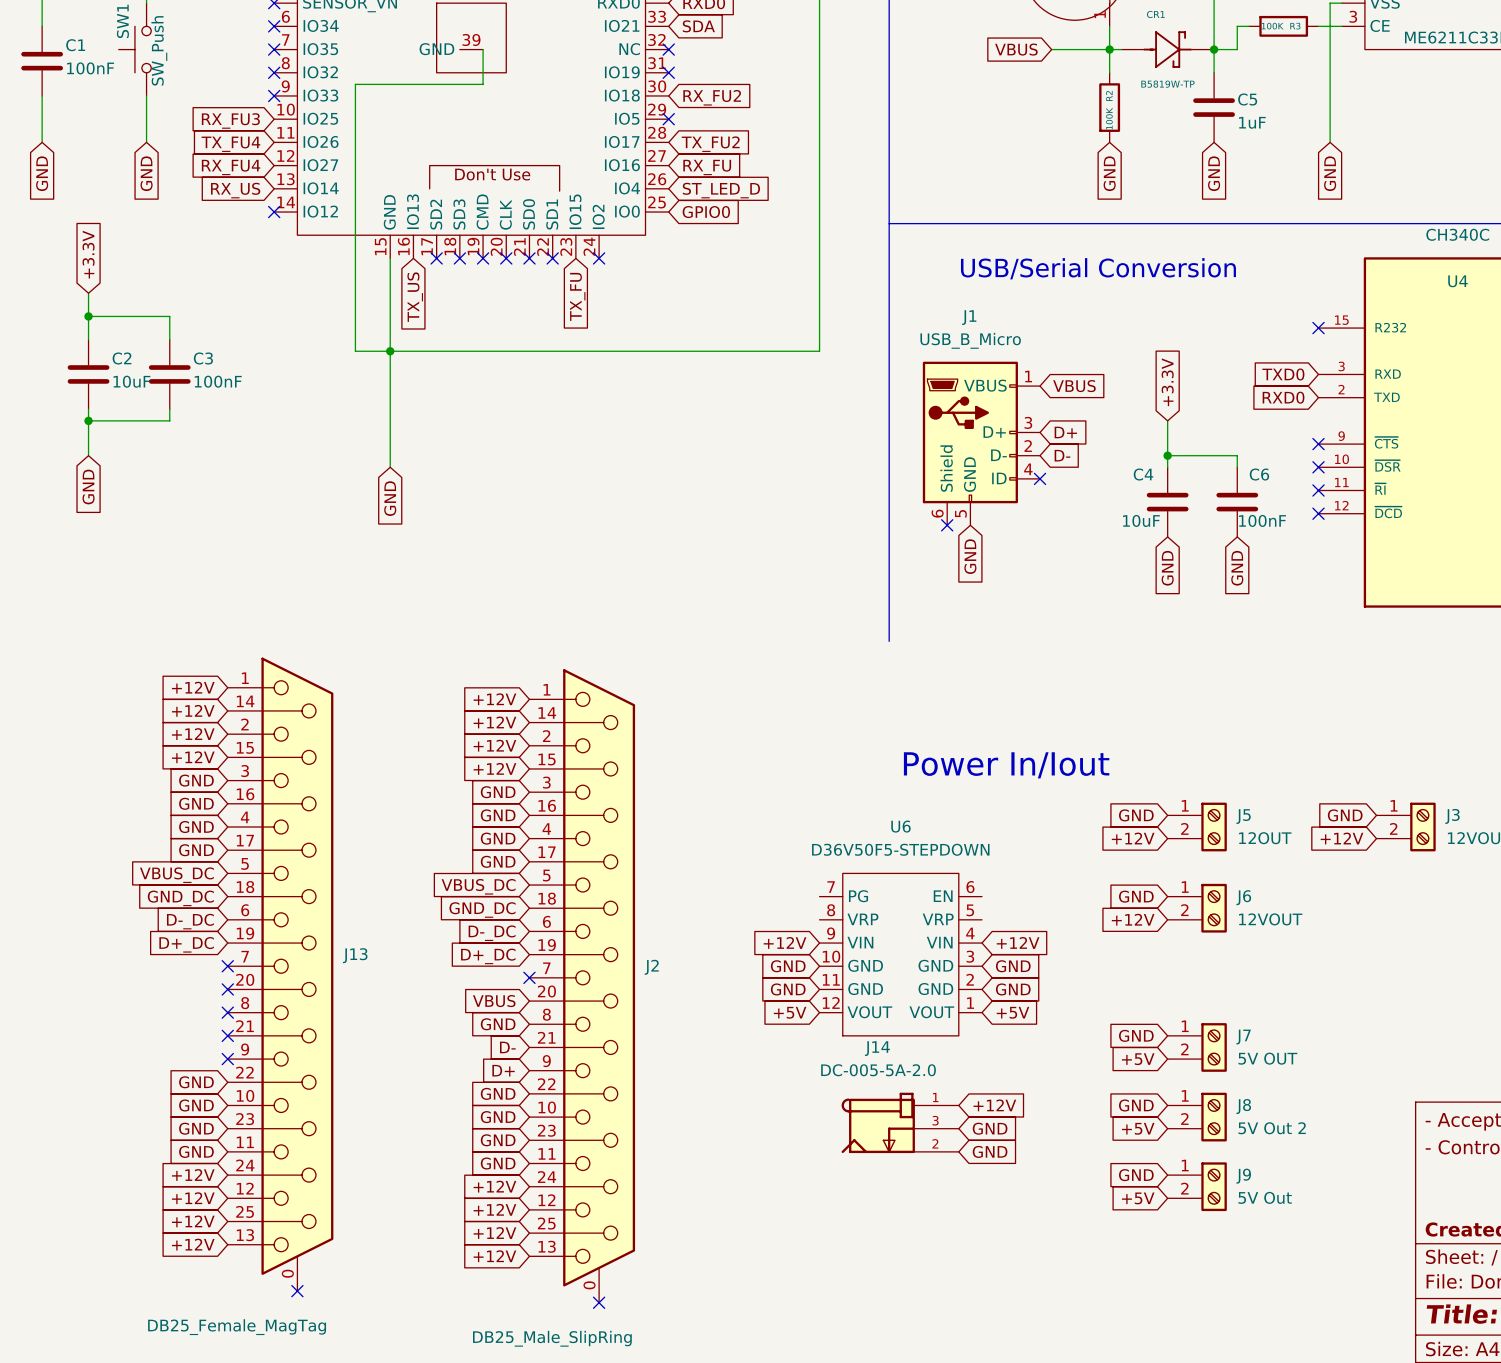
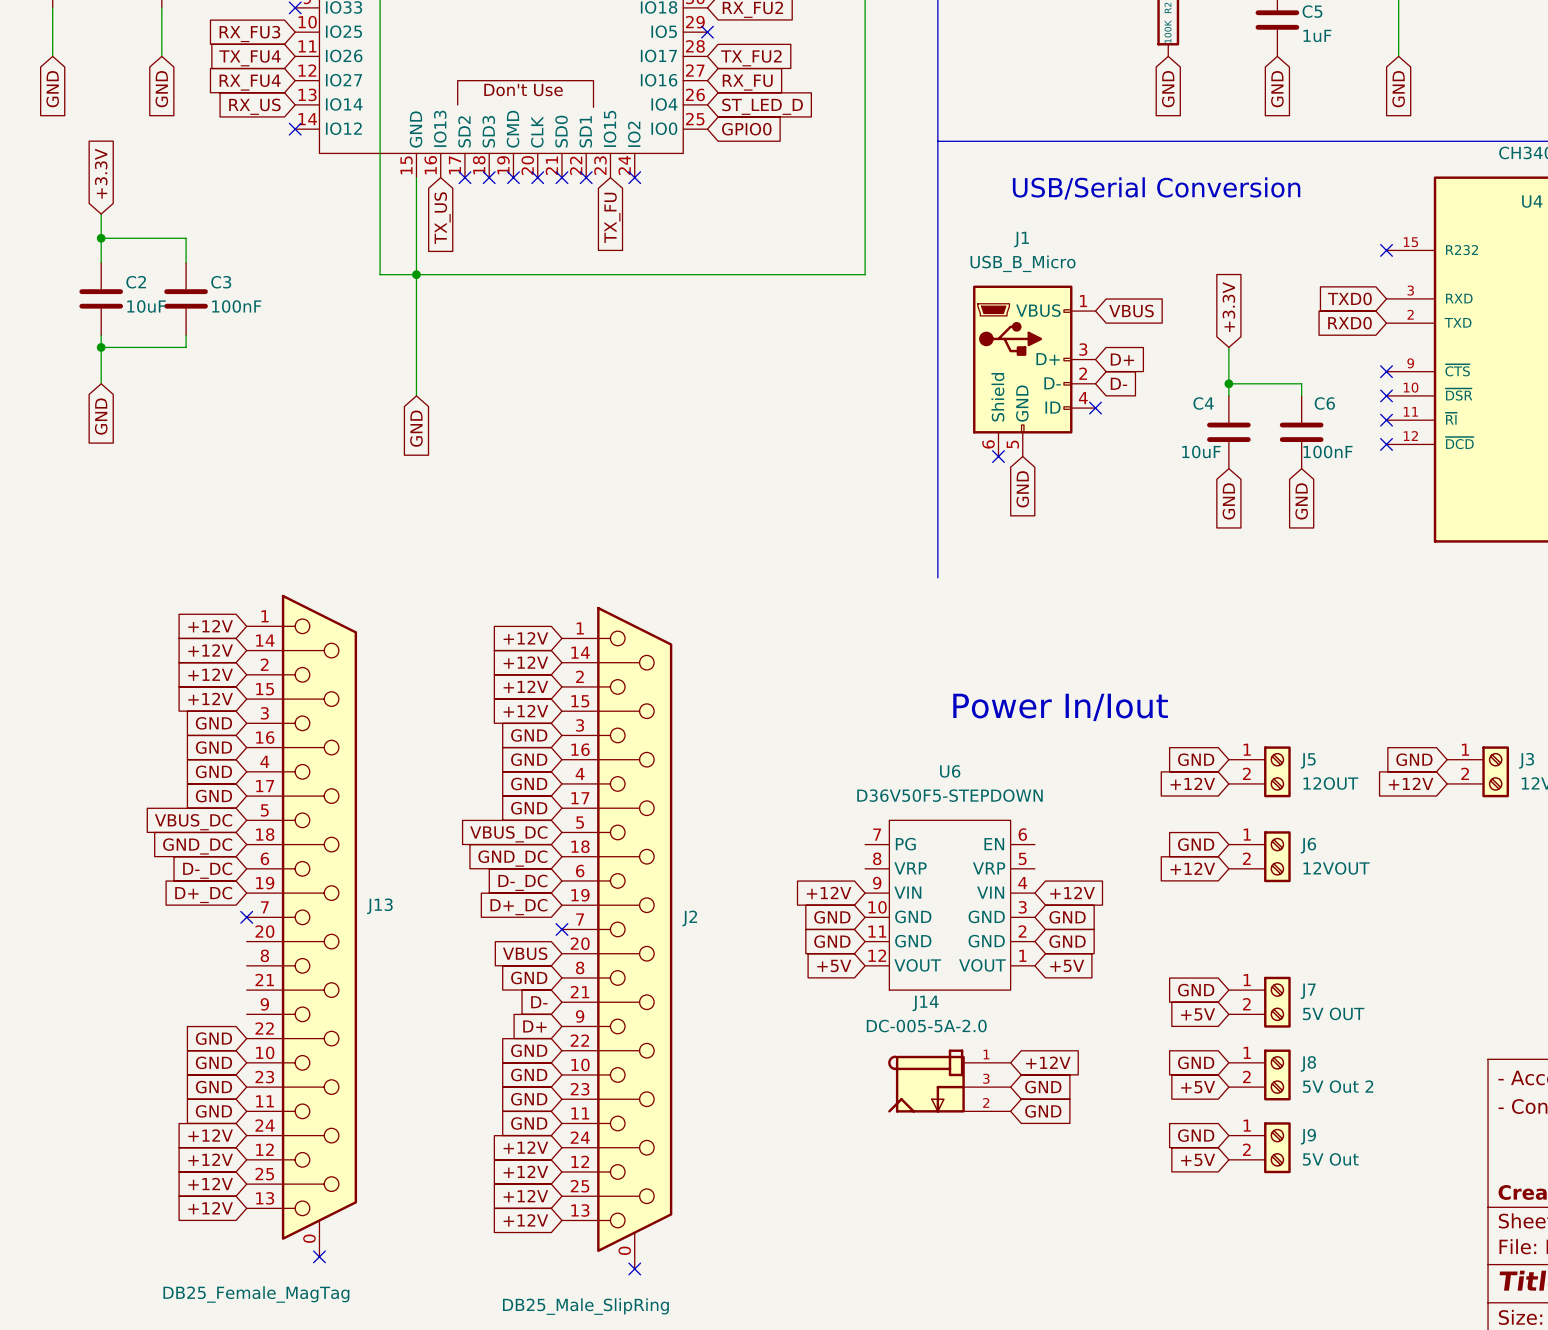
no-connect mark: (227, 989) -> none
no-connect mark: (227, 1012) -> none
no-connect mark: (227, 1035) -> none
no-connect mark: (227, 1059) -> none

